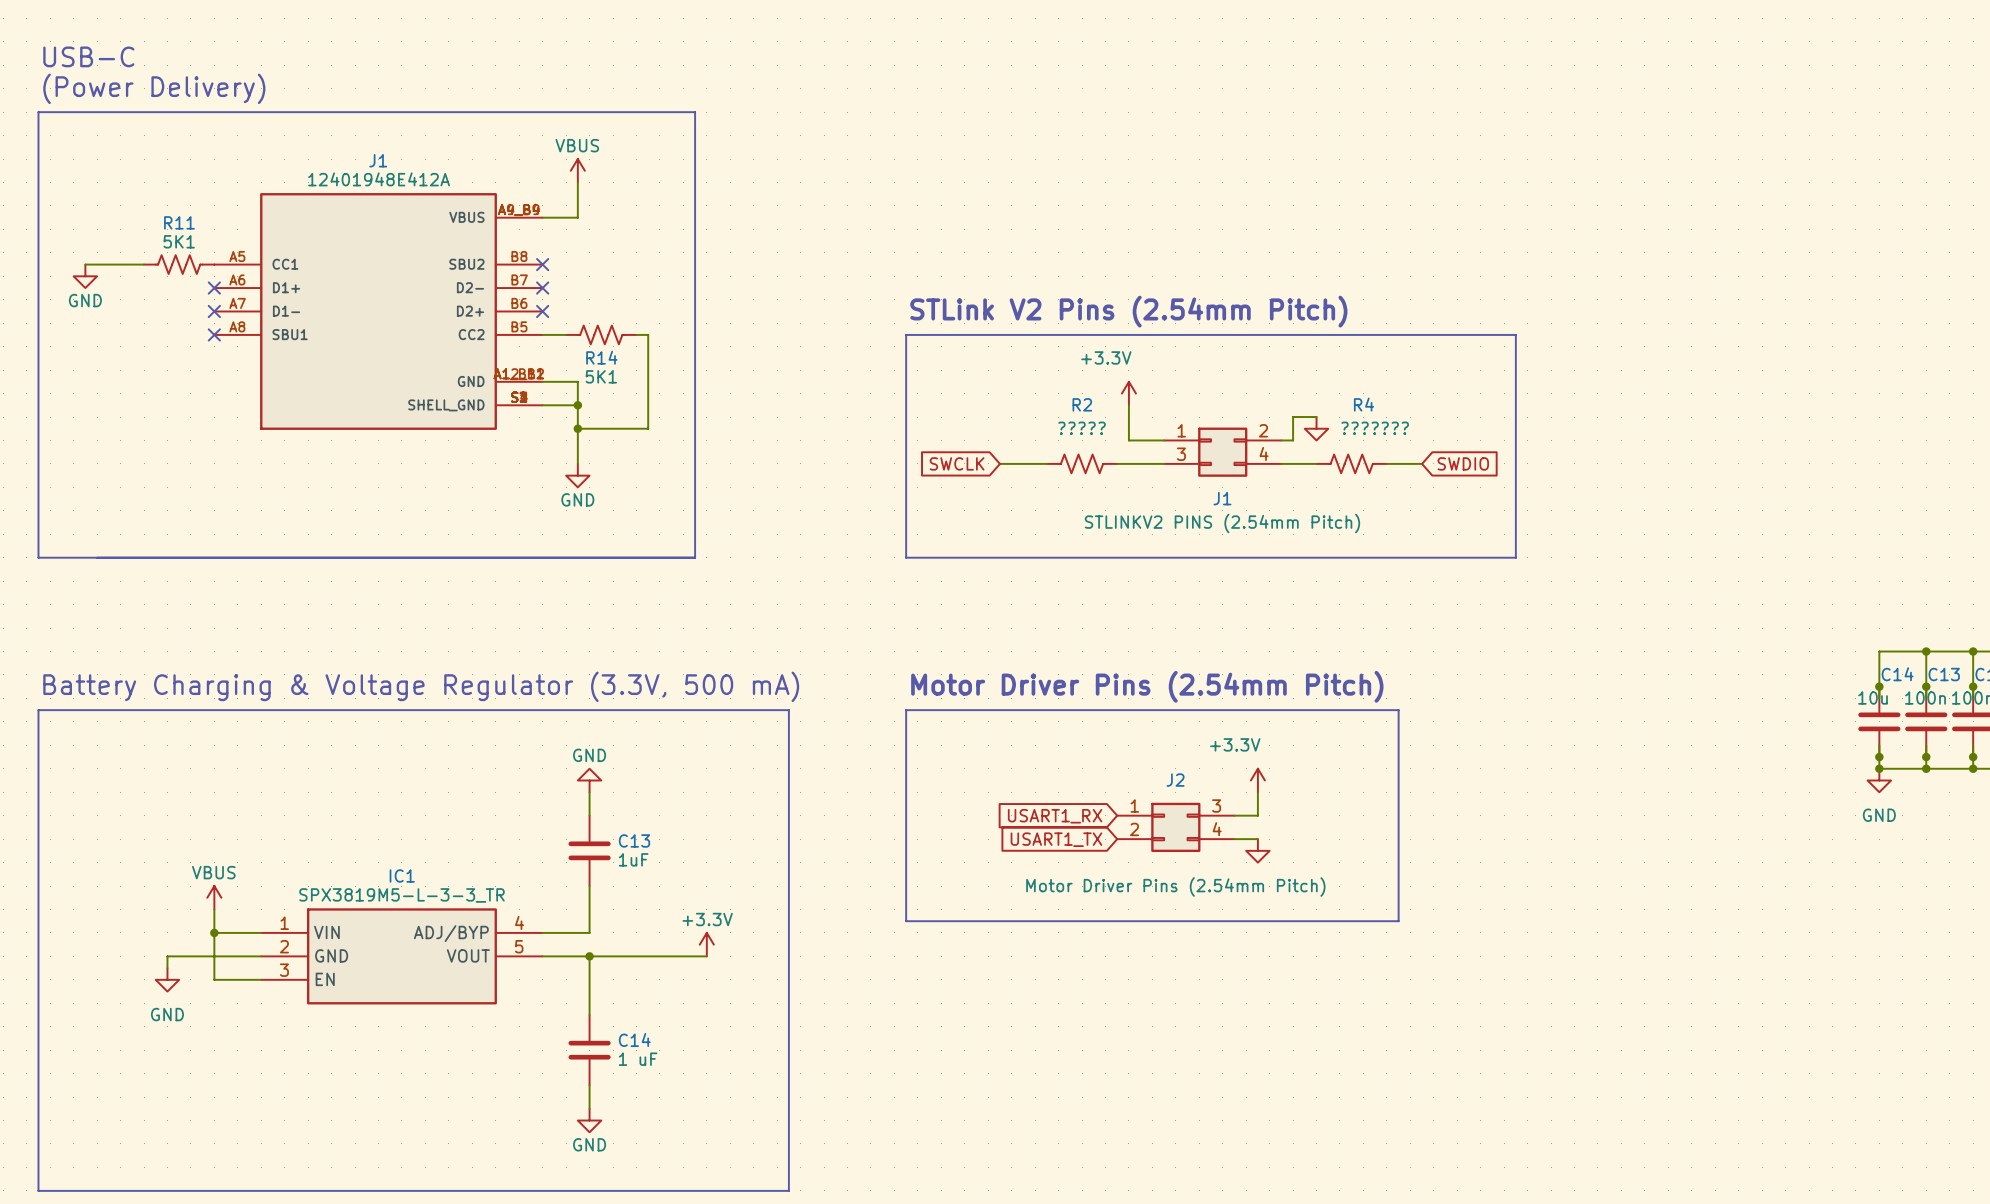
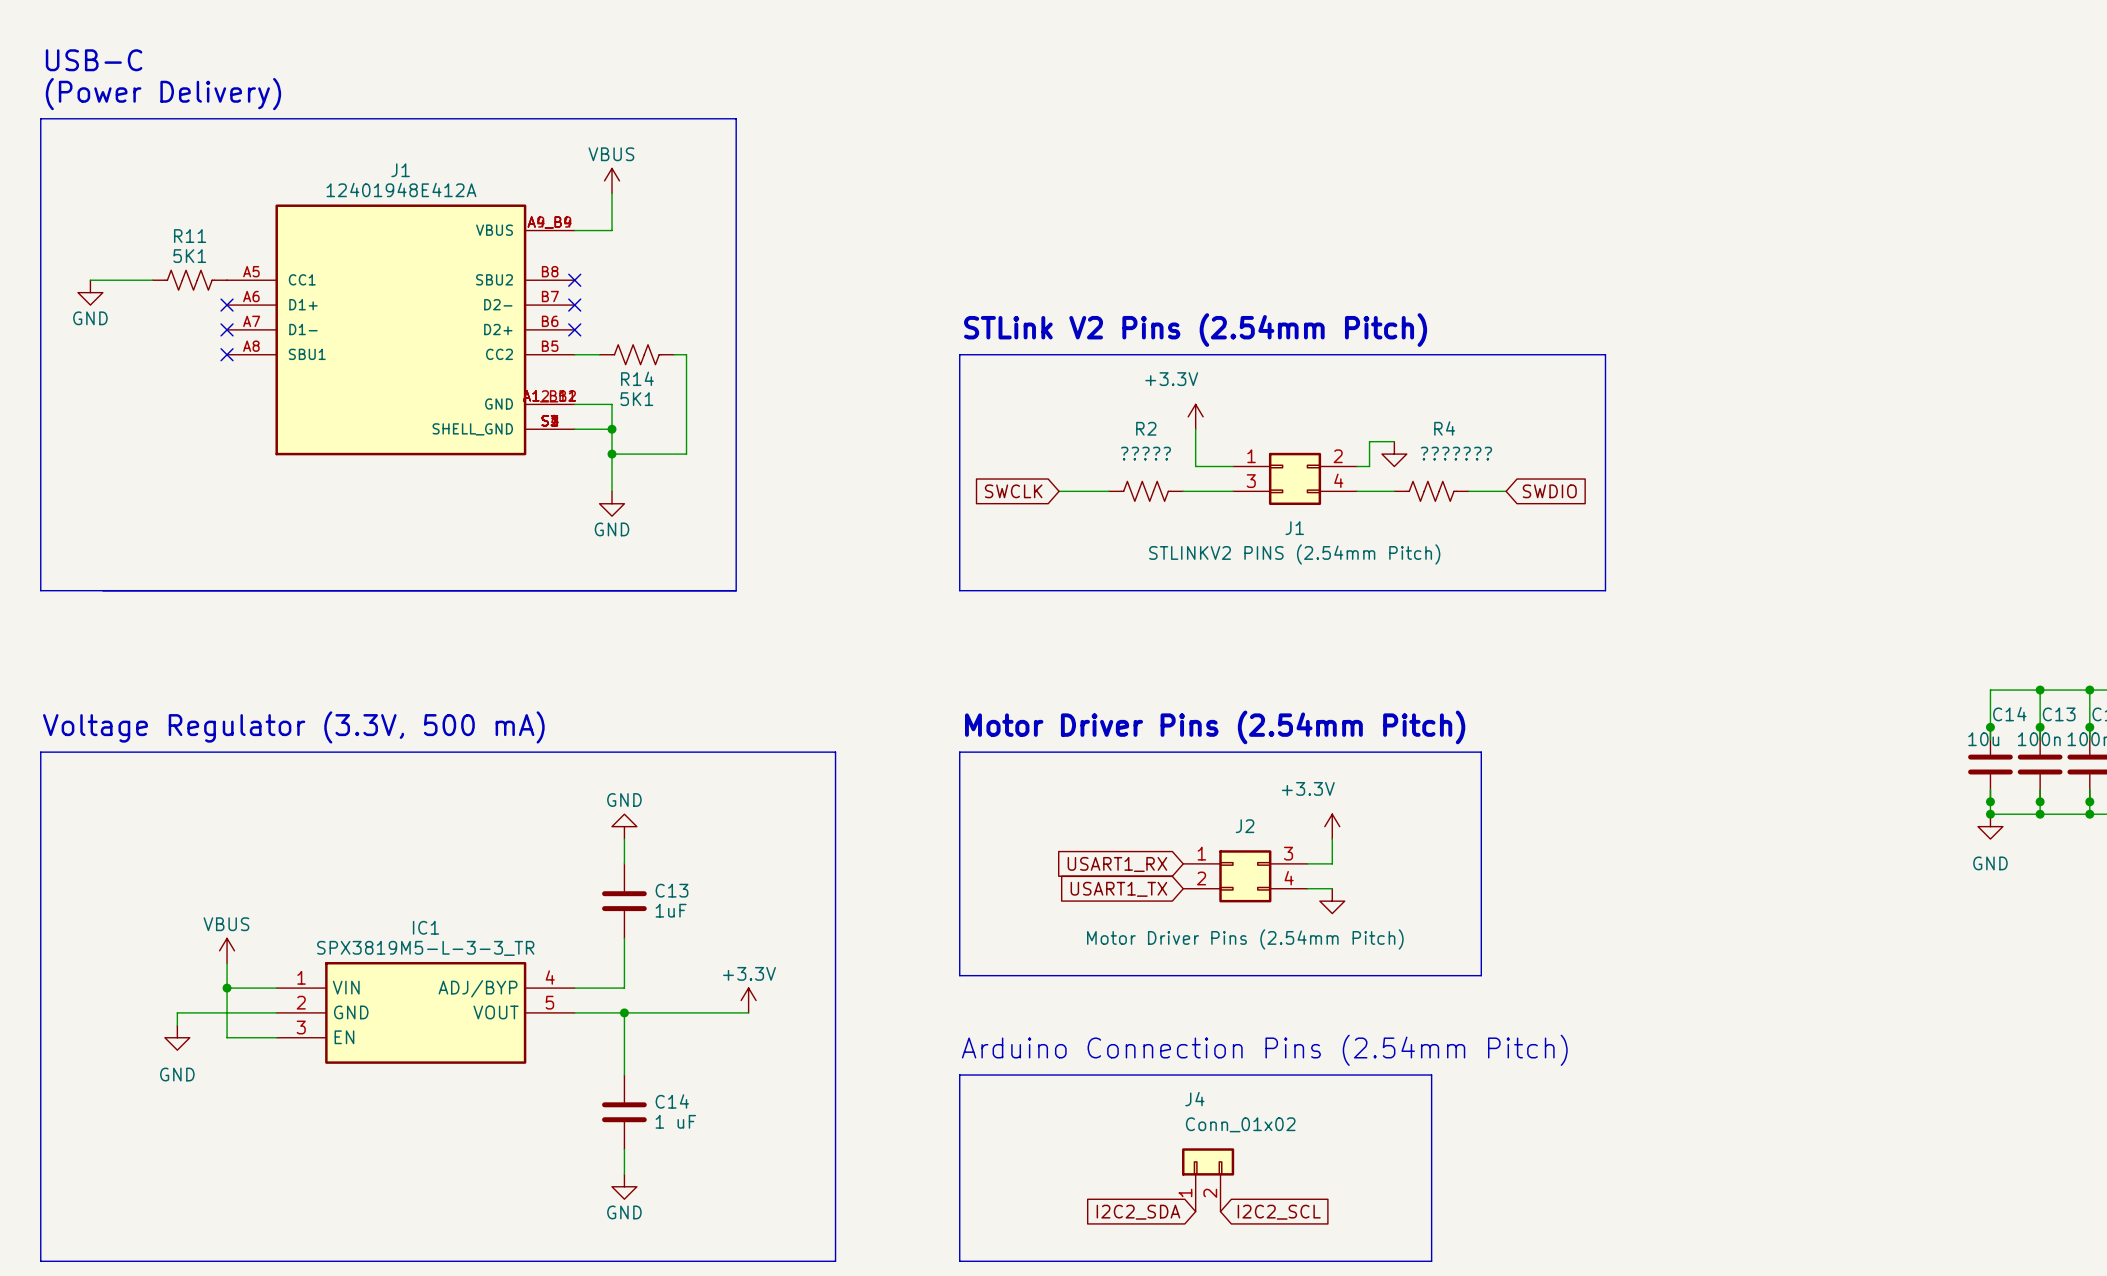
text: Battery Charging & Voltage Regulator (3.3V, 500 mA) (421, 686) -> Voltage Regulator (3.3V, 500 mA) (293, 727)
text: none -> Arduino Connection Pins (2.54mm Pitch) (1264, 1050)
line: none -> (959, 1075) (1431, 1075) (1431, 1261) (959, 1261) (959, 1075)
J4: none -> Conn_01x02 (1208, 1179)
global label: none -> I2C2_SDA (1138, 1212)
global label: none -> I2C2_SCL (1279, 1212)

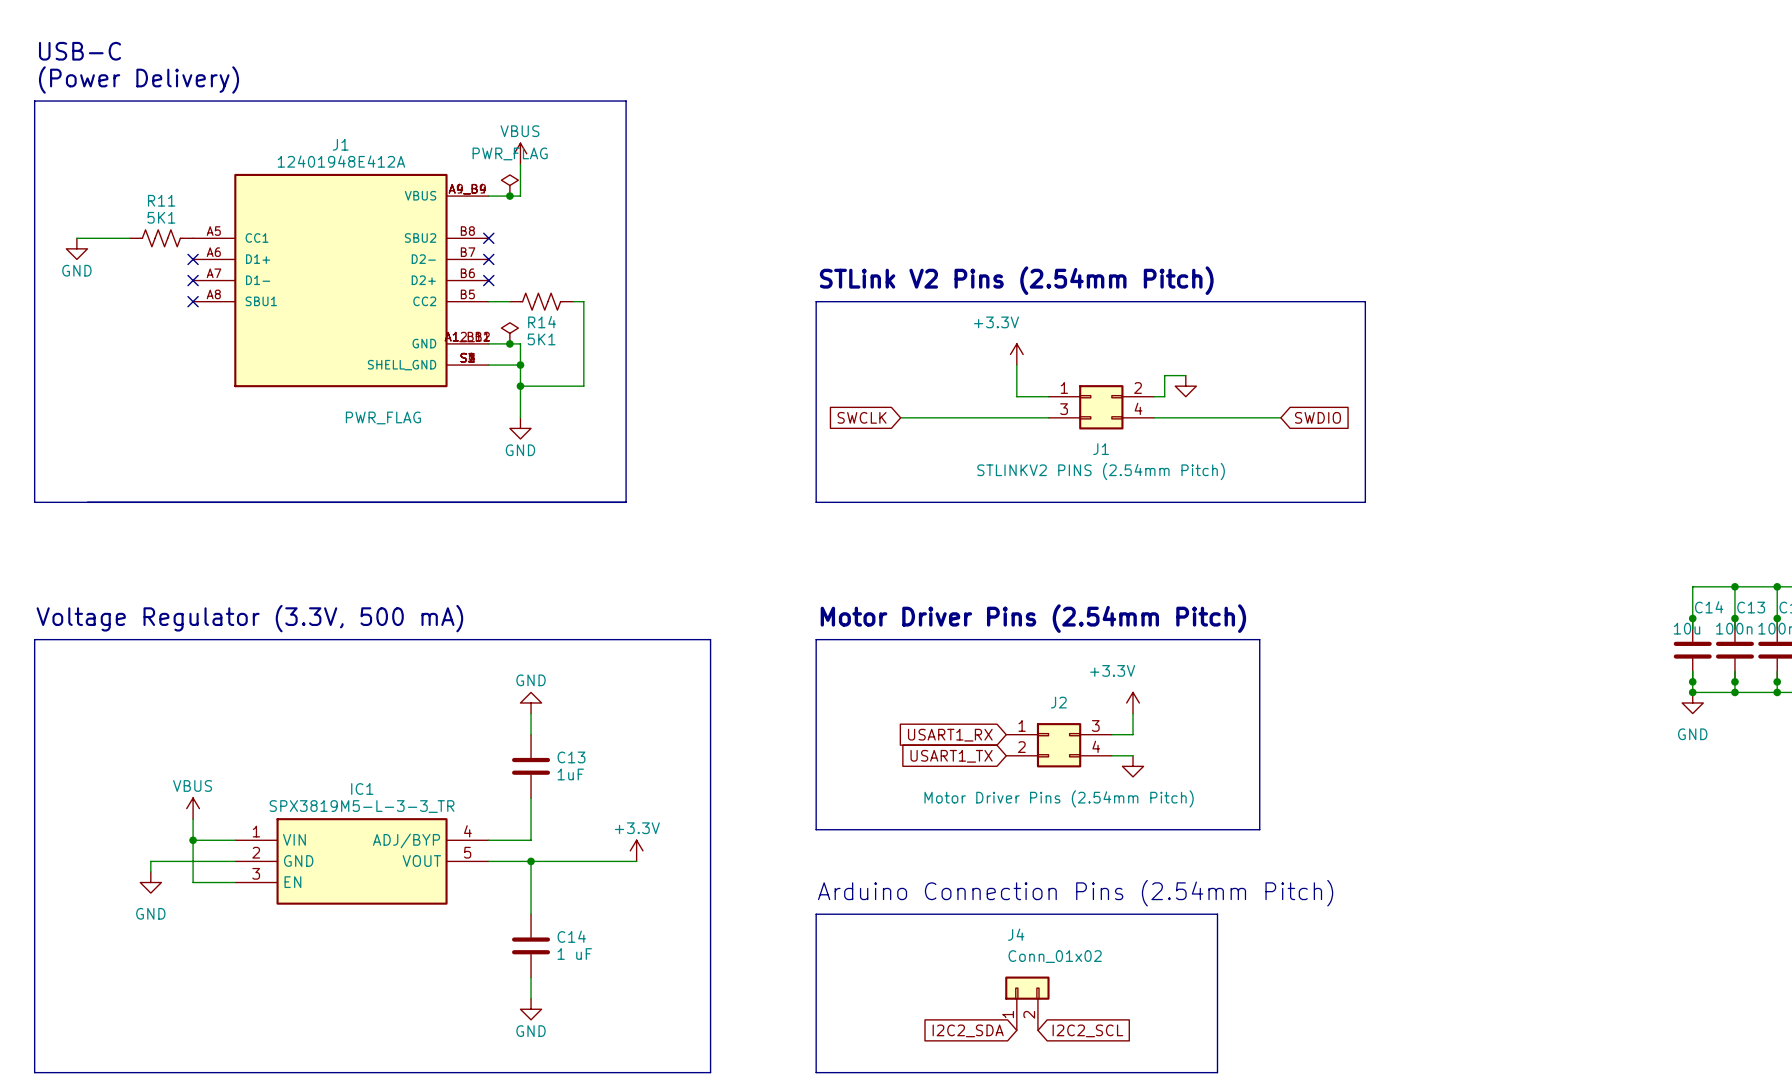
power symbol: none -> PWR_FLAG (509, 185)
junction: none -> (509, 196)
power symbol: none -> PWR_FLAG (509, 333)
junction: none -> (509, 343)
R2: ????? (1146, 491) -> none
R4: ??????? (1431, 491) -> none

